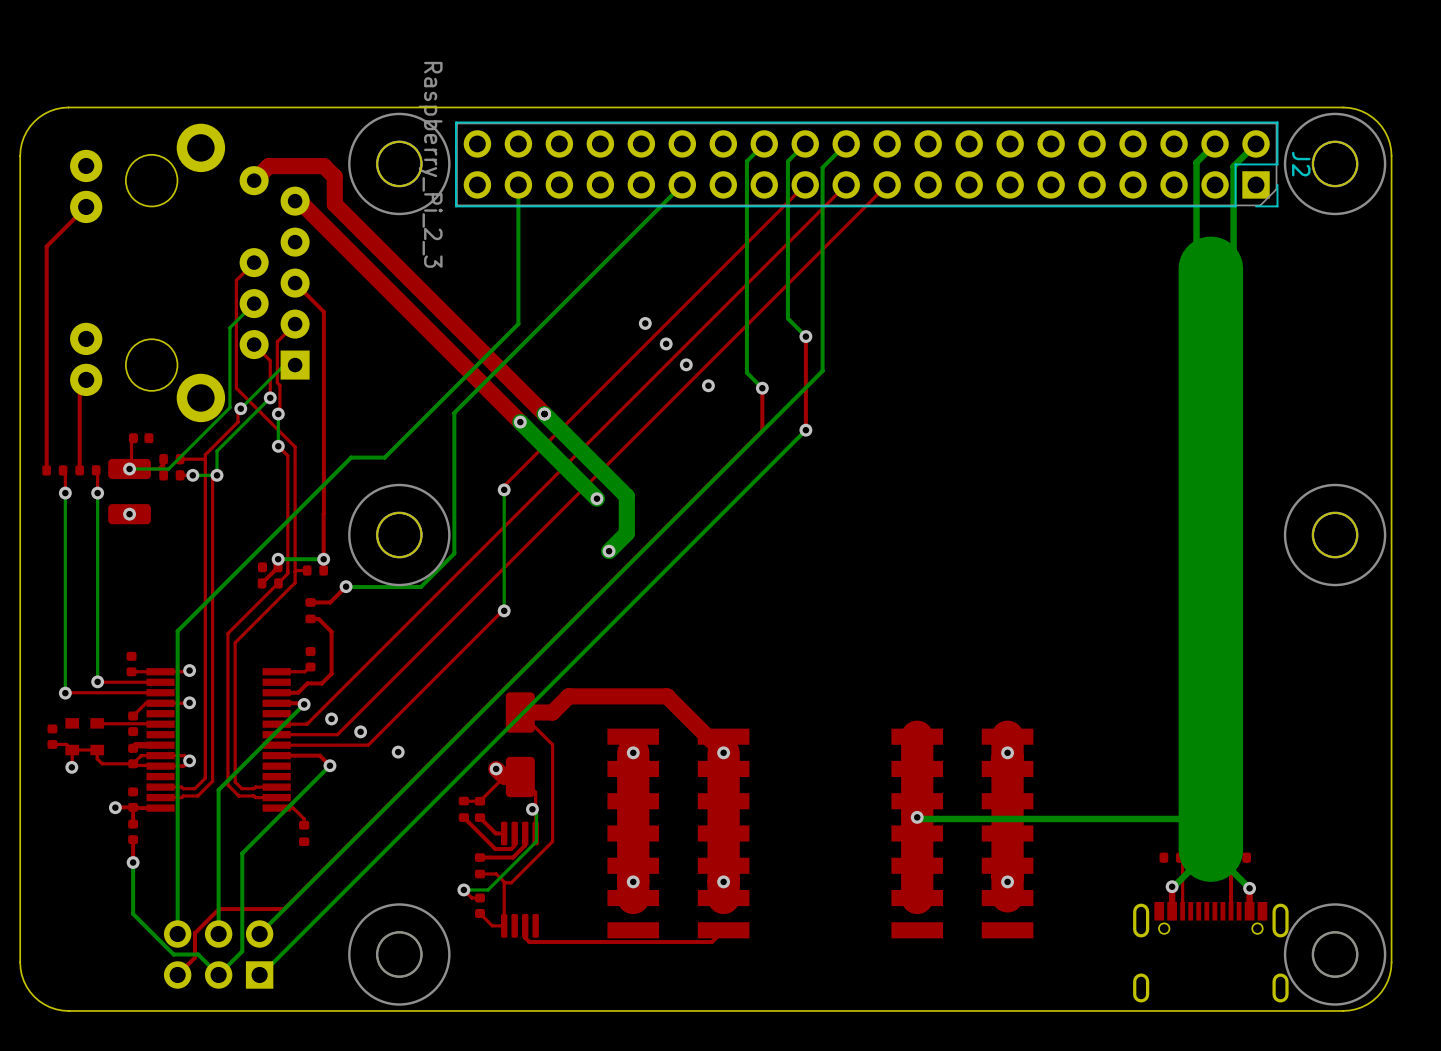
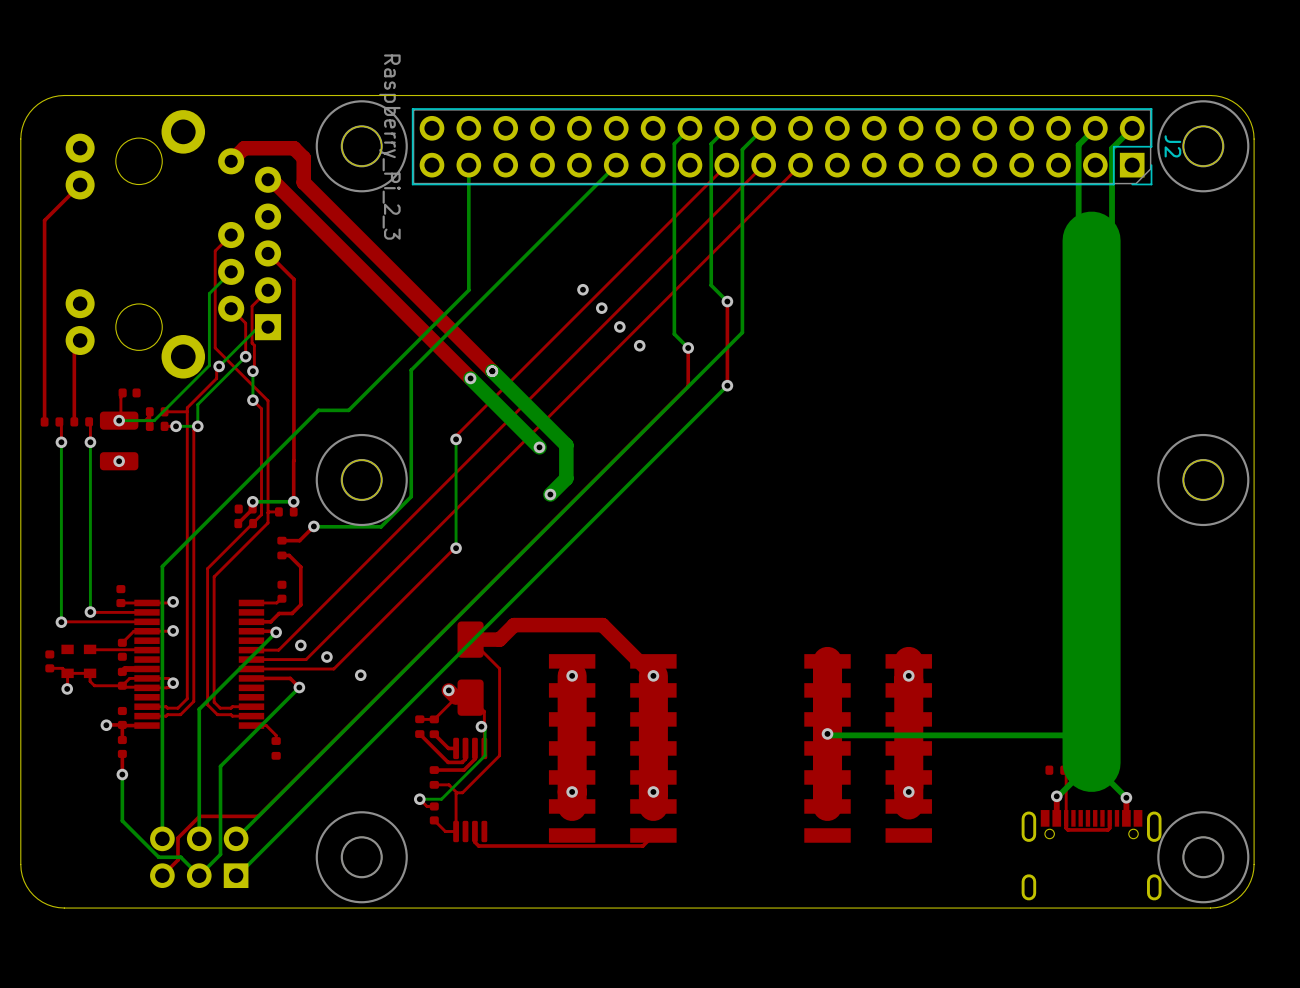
top track: (1230, 857) (1231, 911) -> (1066, 818) (1066, 828) (1068, 829) (1107, 829) (1109, 828) (1109, 818)
part: (1238, 857) -> none

